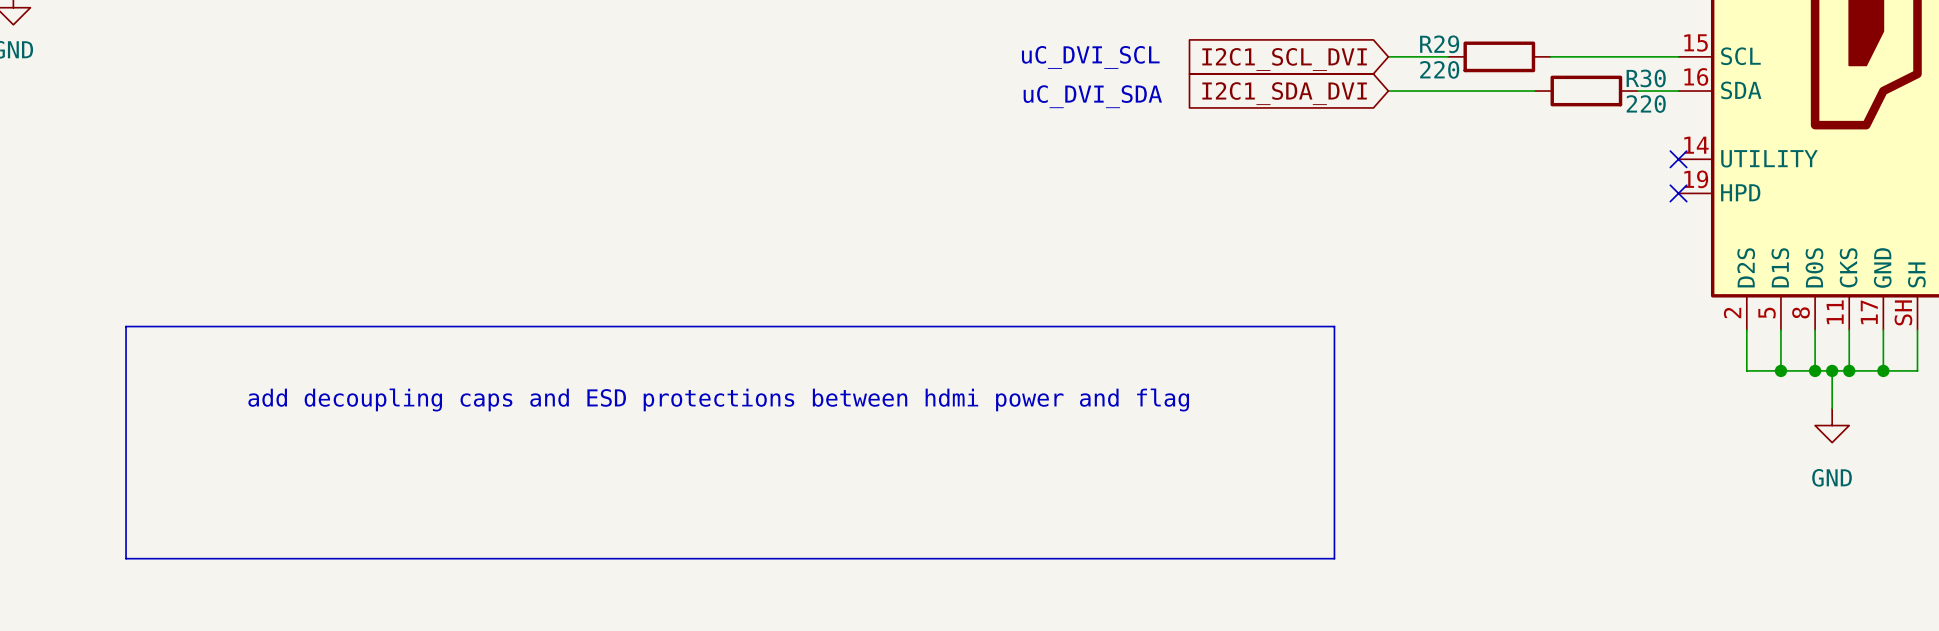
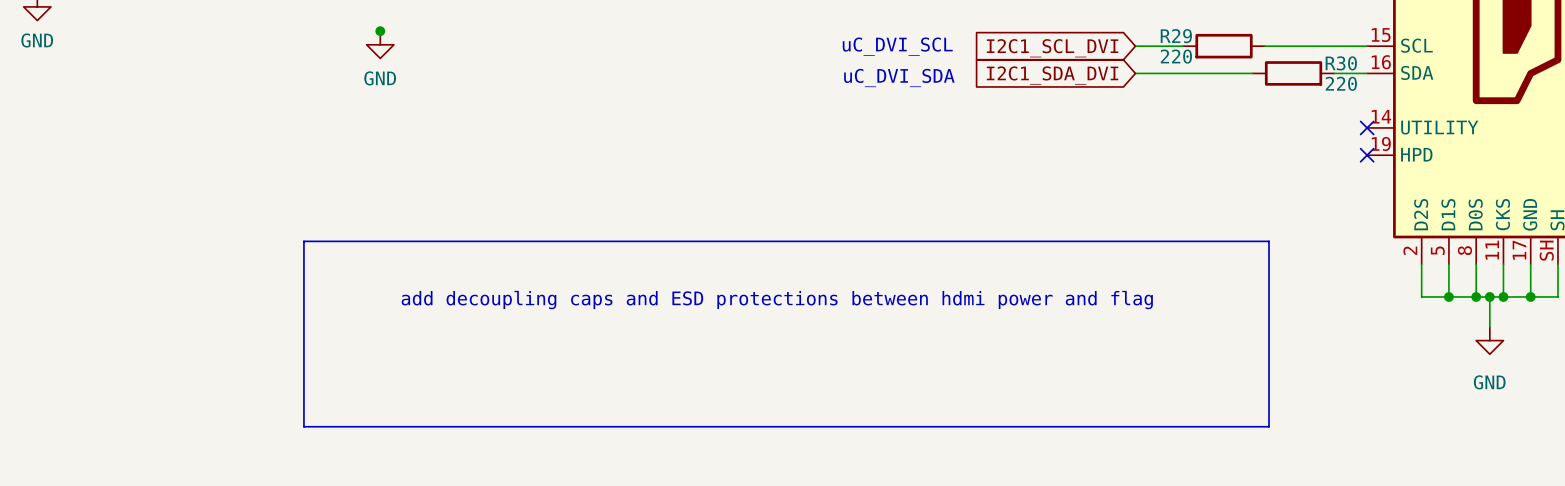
junction: none -> (380, 31)
power symbol: none -> GND (380, 44)
line: (126, 326) (1334, 326) (1334, 558) (126, 558) (126, 326) -> (303, 241) (1269, 241) (1269, 426) (303, 426) (303, 241)
text position: add decoupling caps and ESD protections between hdmi power and flag (718, 400) -> add decoupling caps and ESD protections between hdmi power and flag (777, 300)

